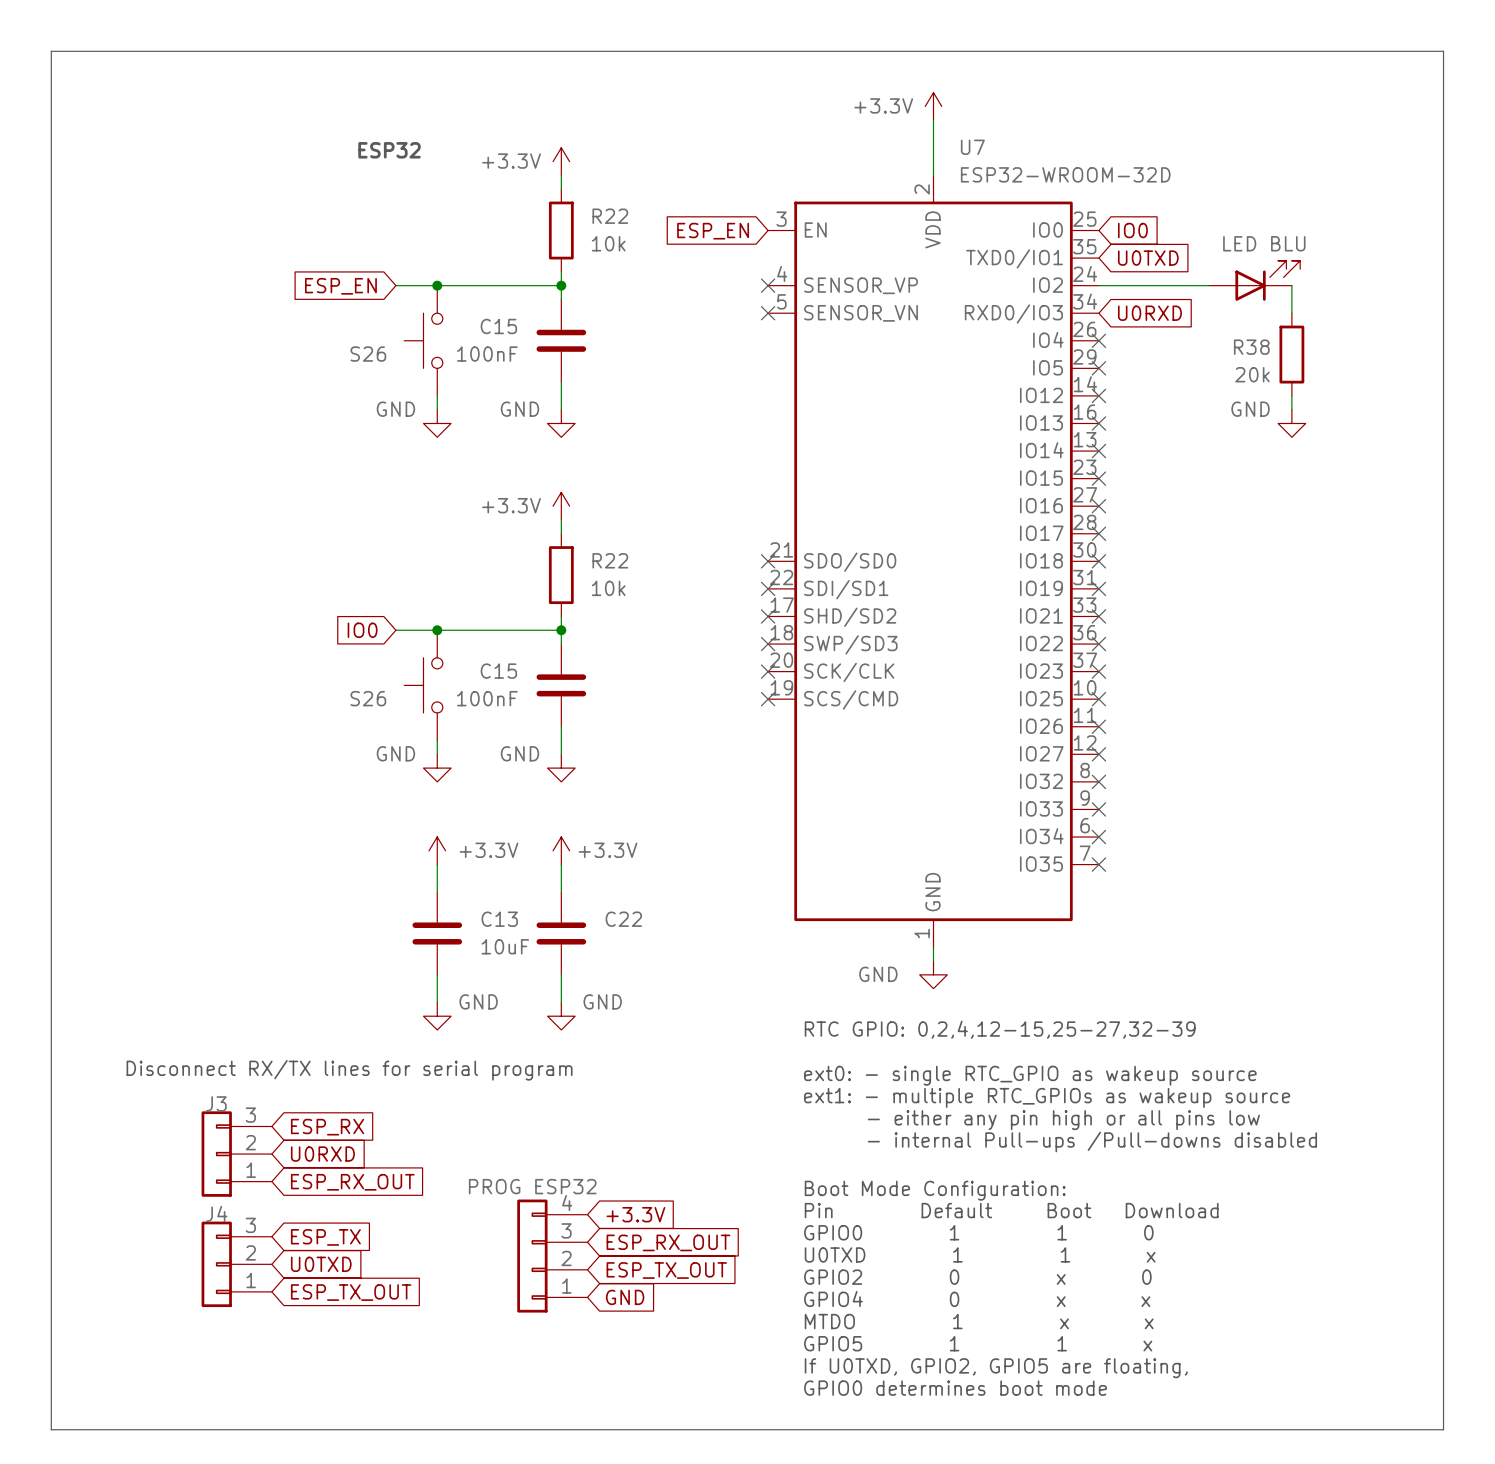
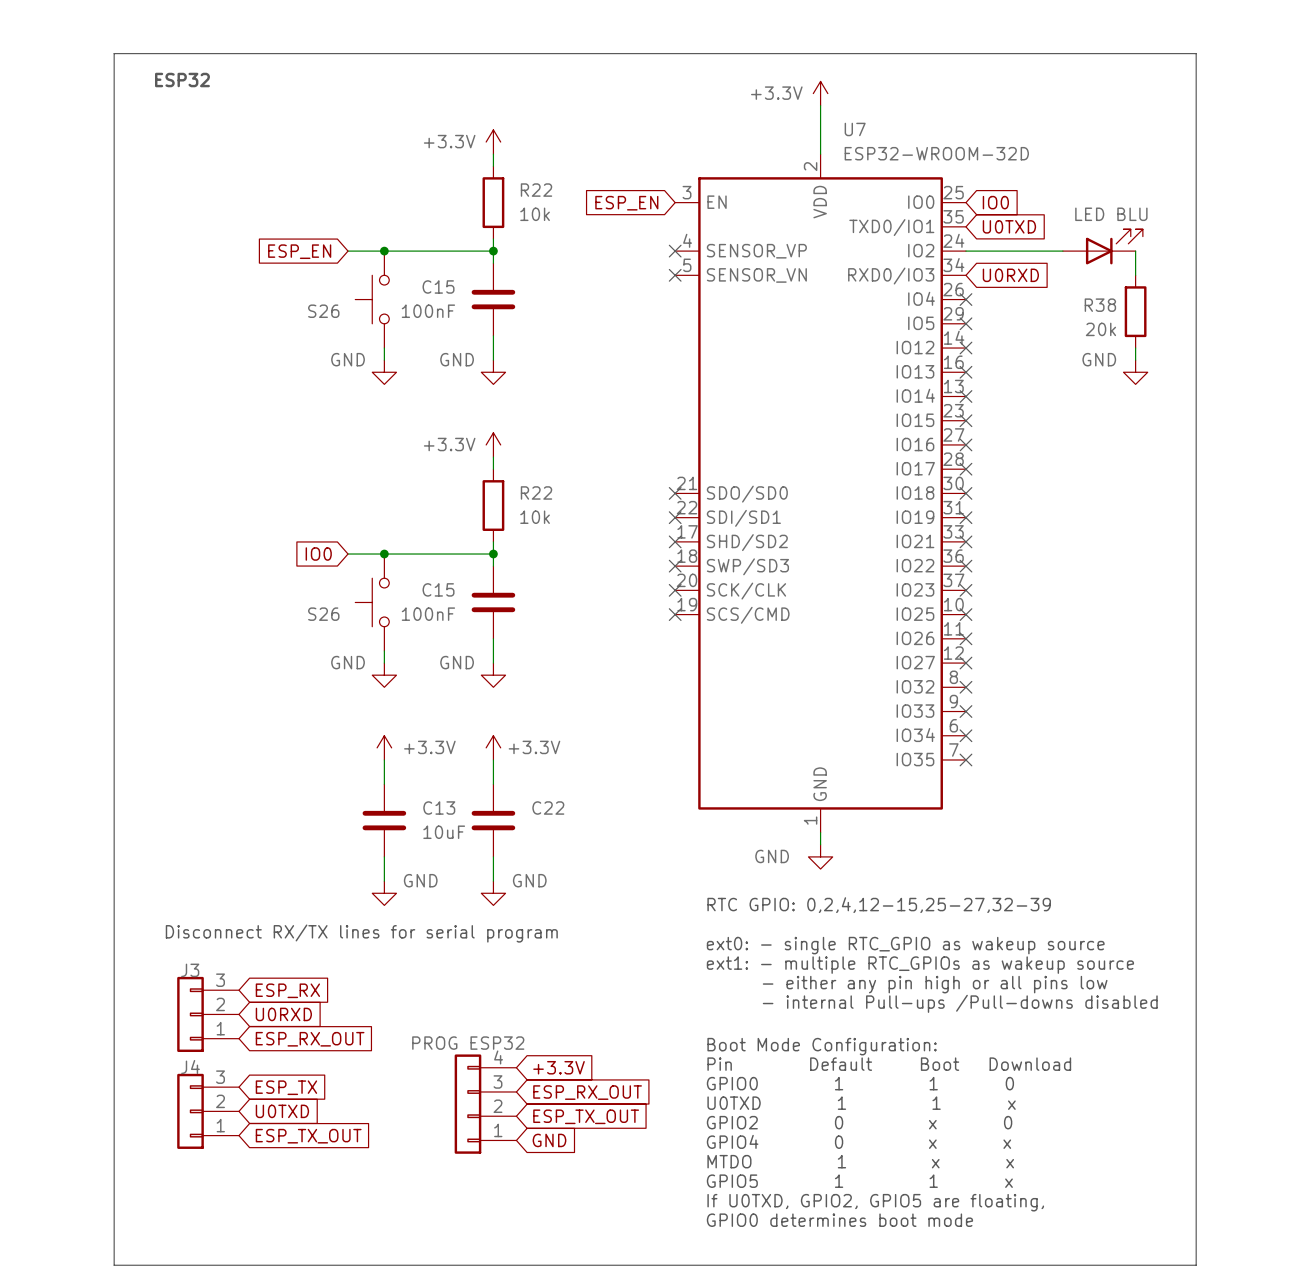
line: (51, 51) (1443, 51) (1443, 1429) (51, 1429) (51, 51) -> (114, 53) (114, 1265) (1196, 1265) (1196, 53) (114, 53)
text position: ESP32 (389, 150) -> ESP32 (182, 80)
text position: Disconnect RX/TX lines for serial program (349, 1070) -> Disconnect RX/TX lines for serial program (361, 933)

